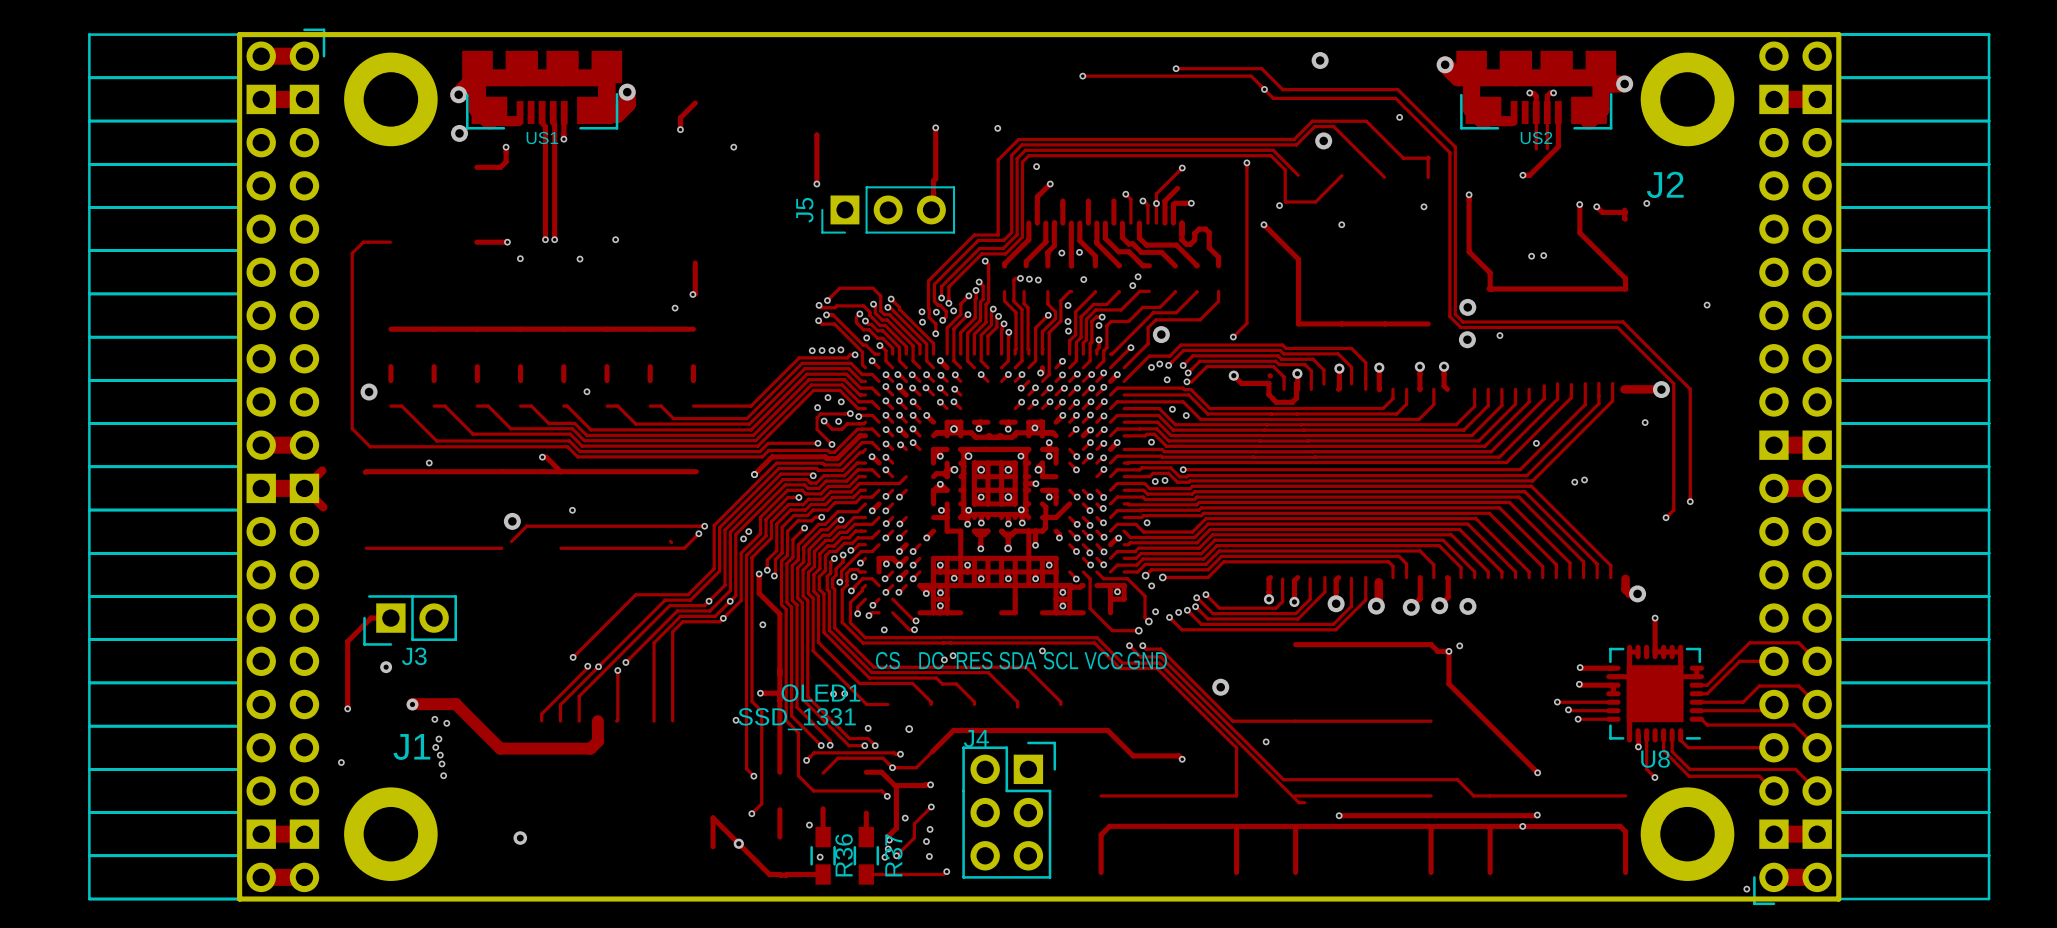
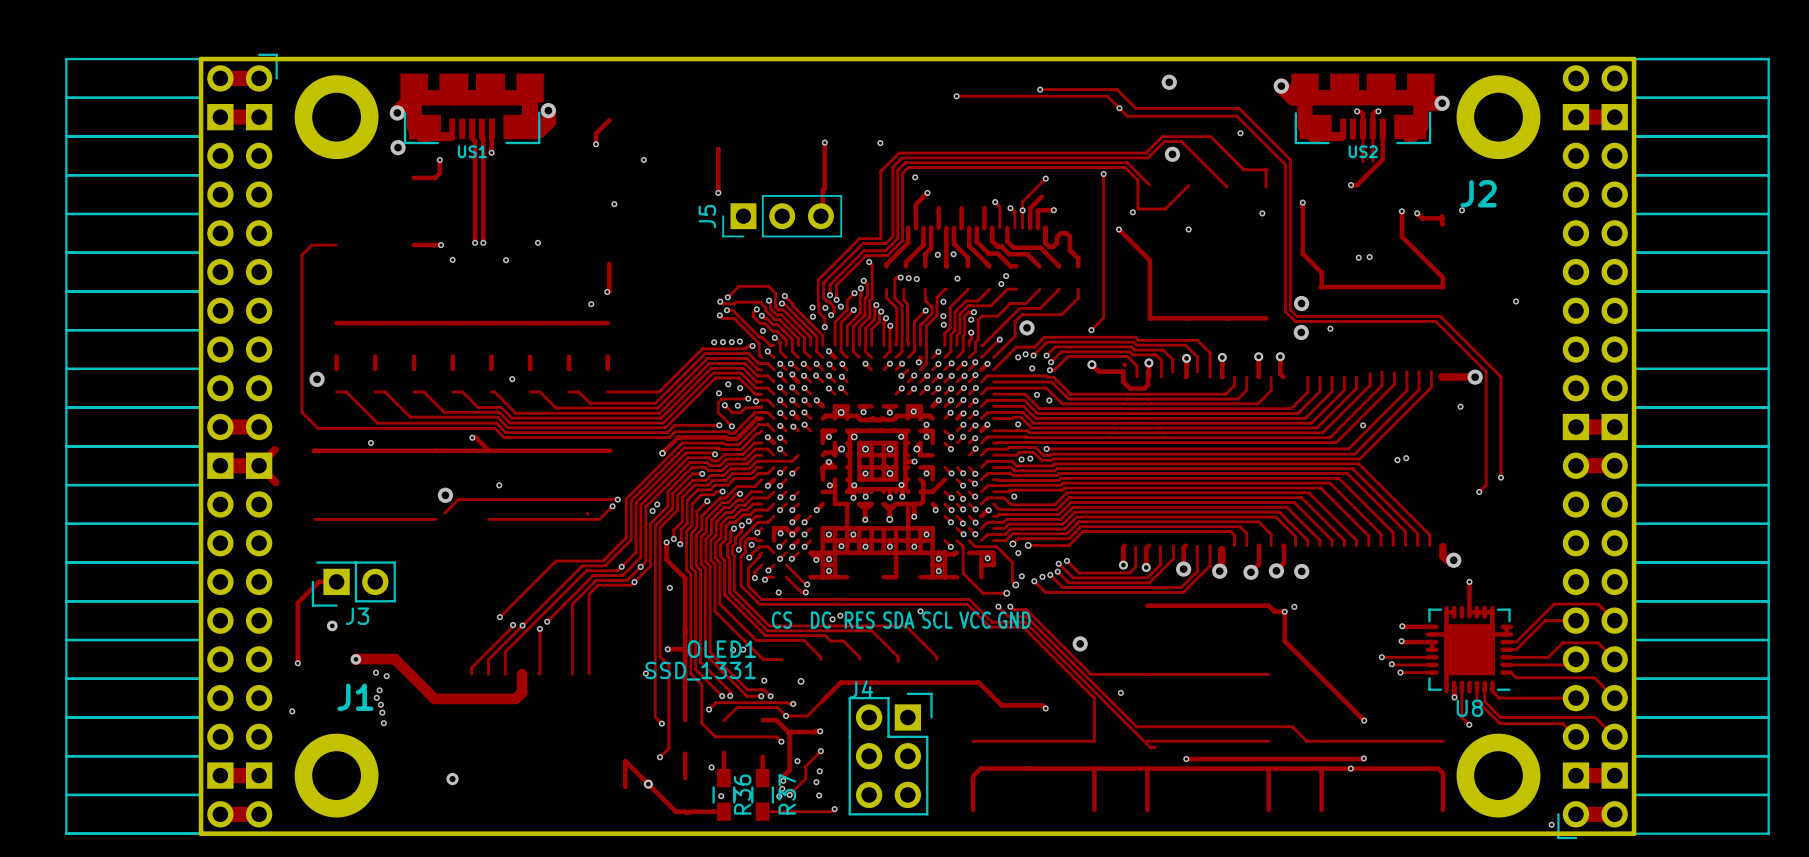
via: none -> (614, 204)

